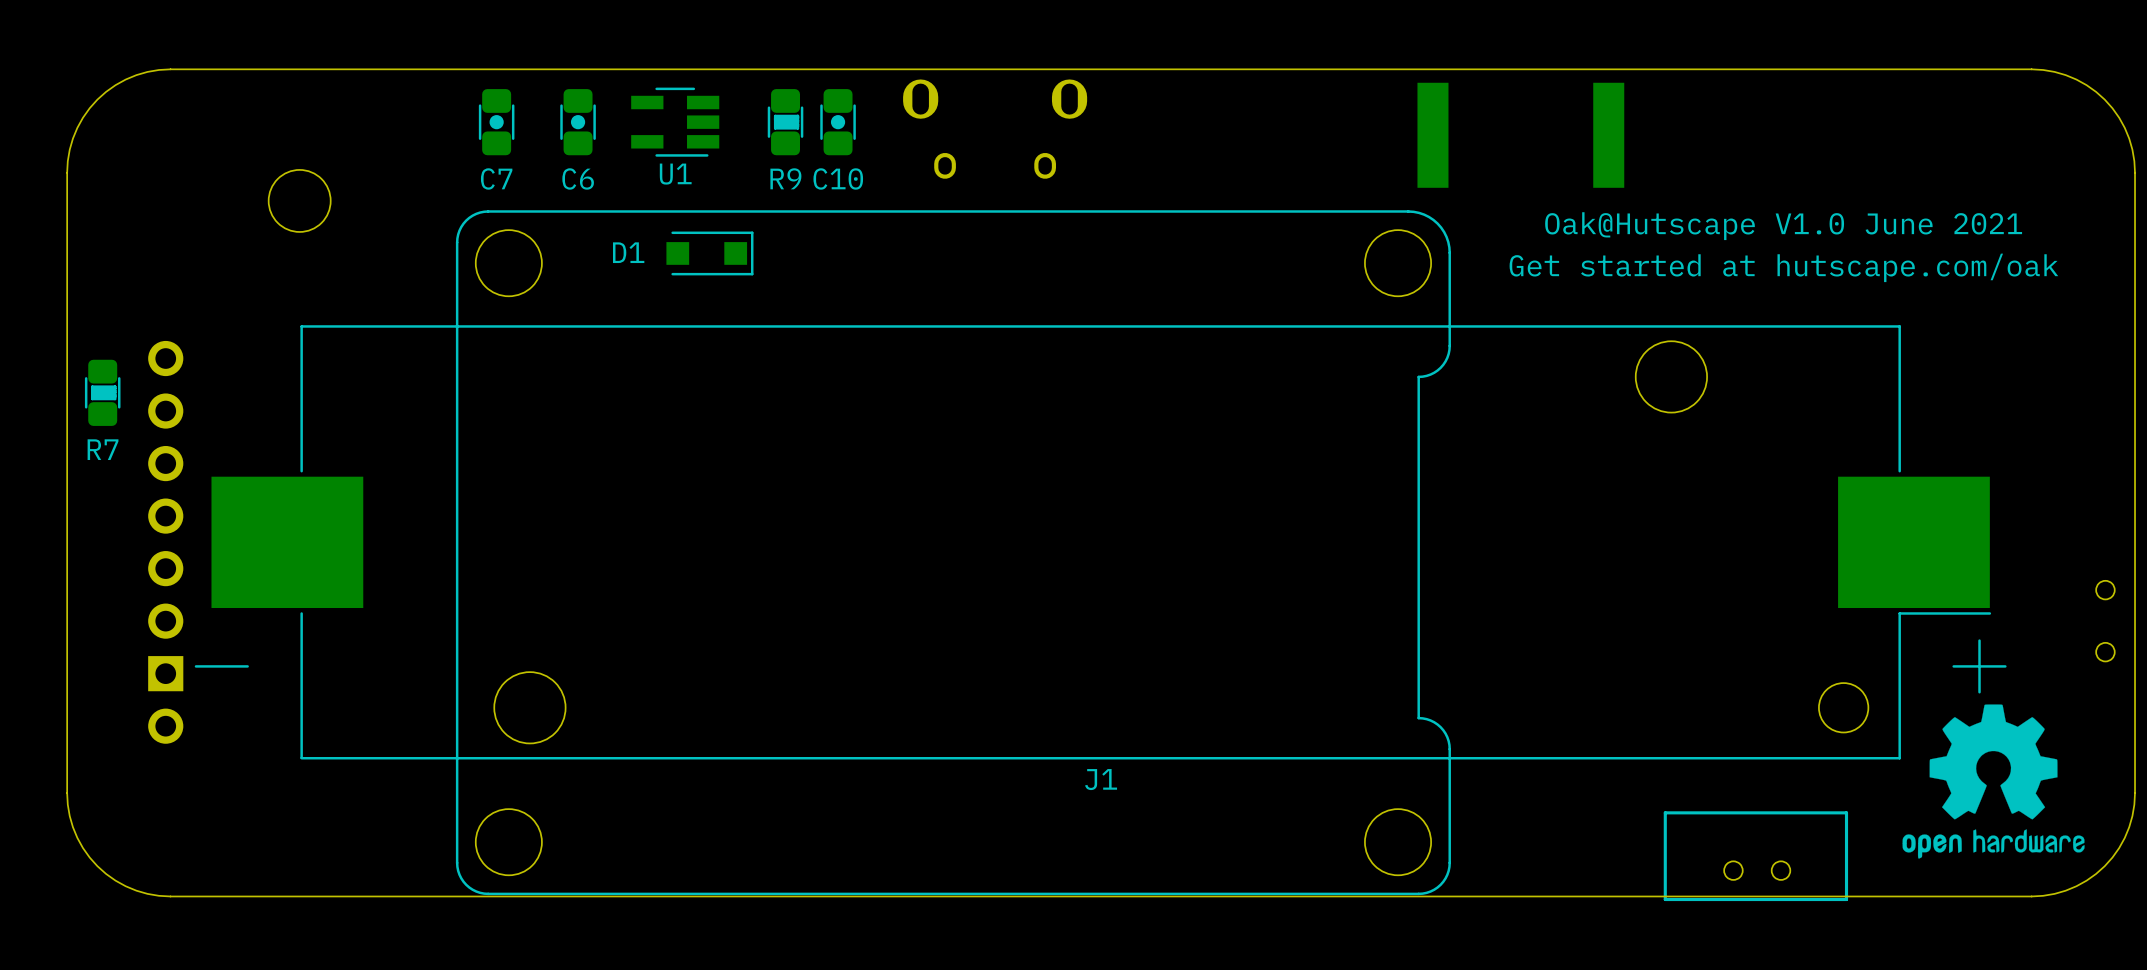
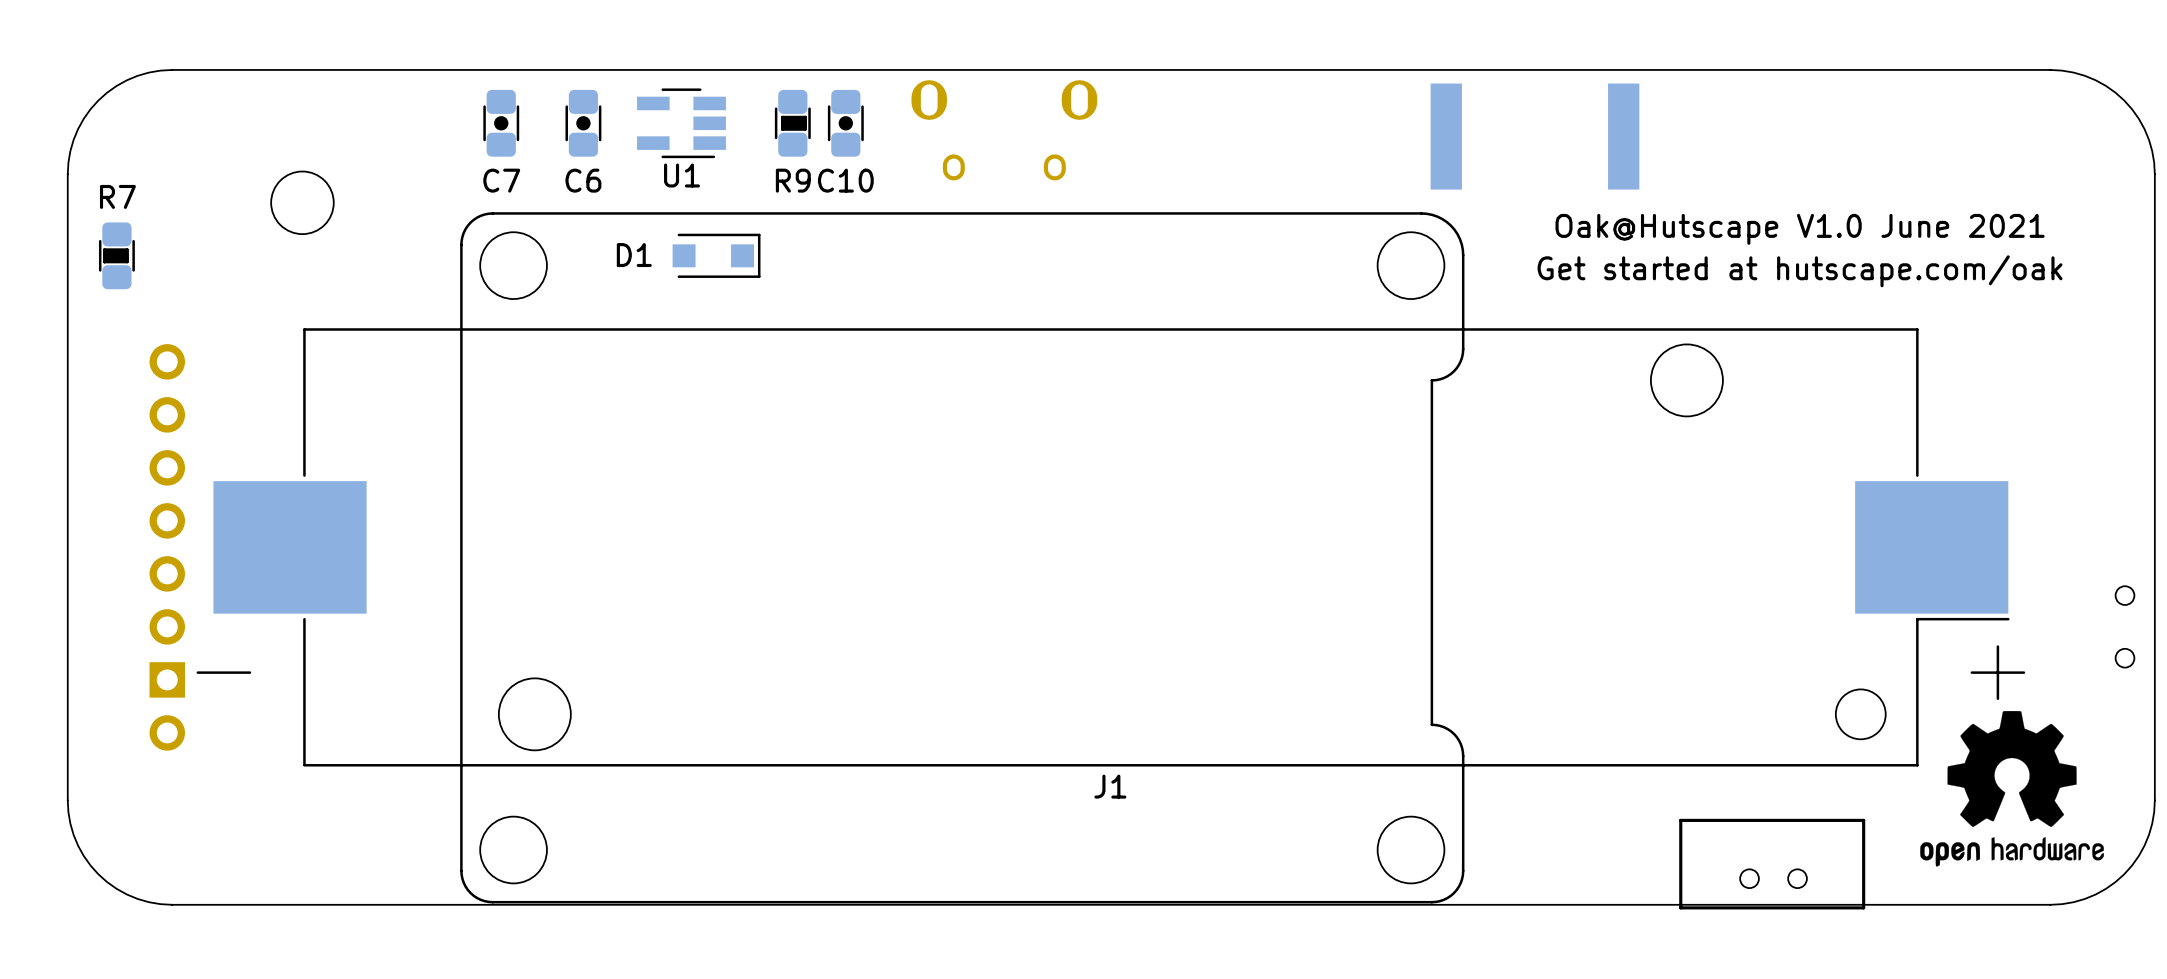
R7 rotation: 0° (102, 392) -> 180° (116, 255)
R7 position: (102, 392) -> (116, 255)

